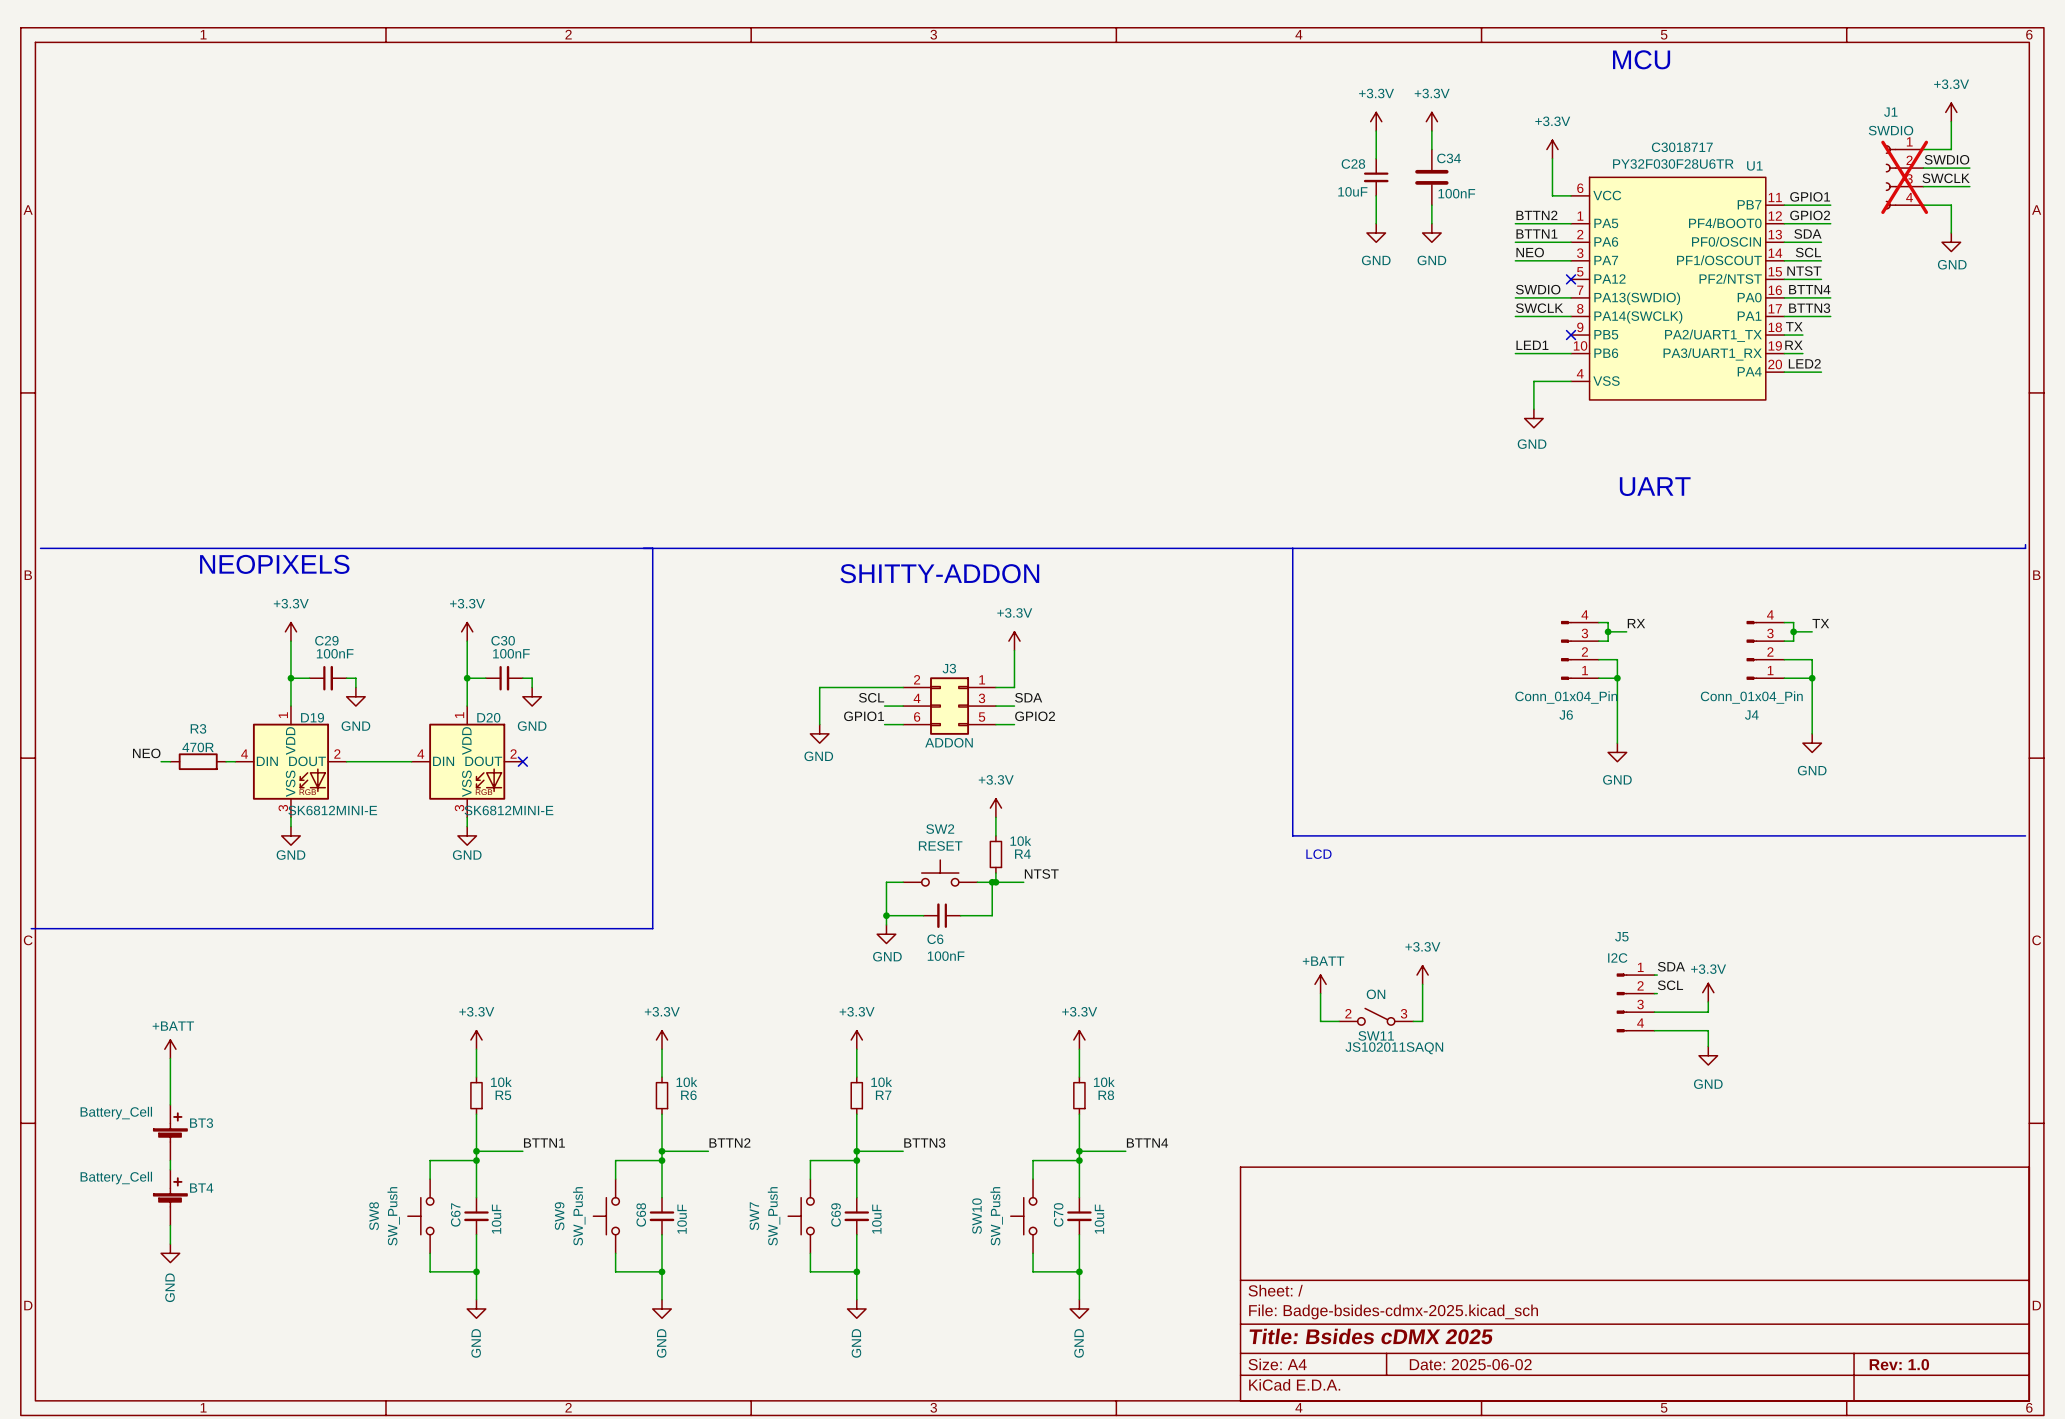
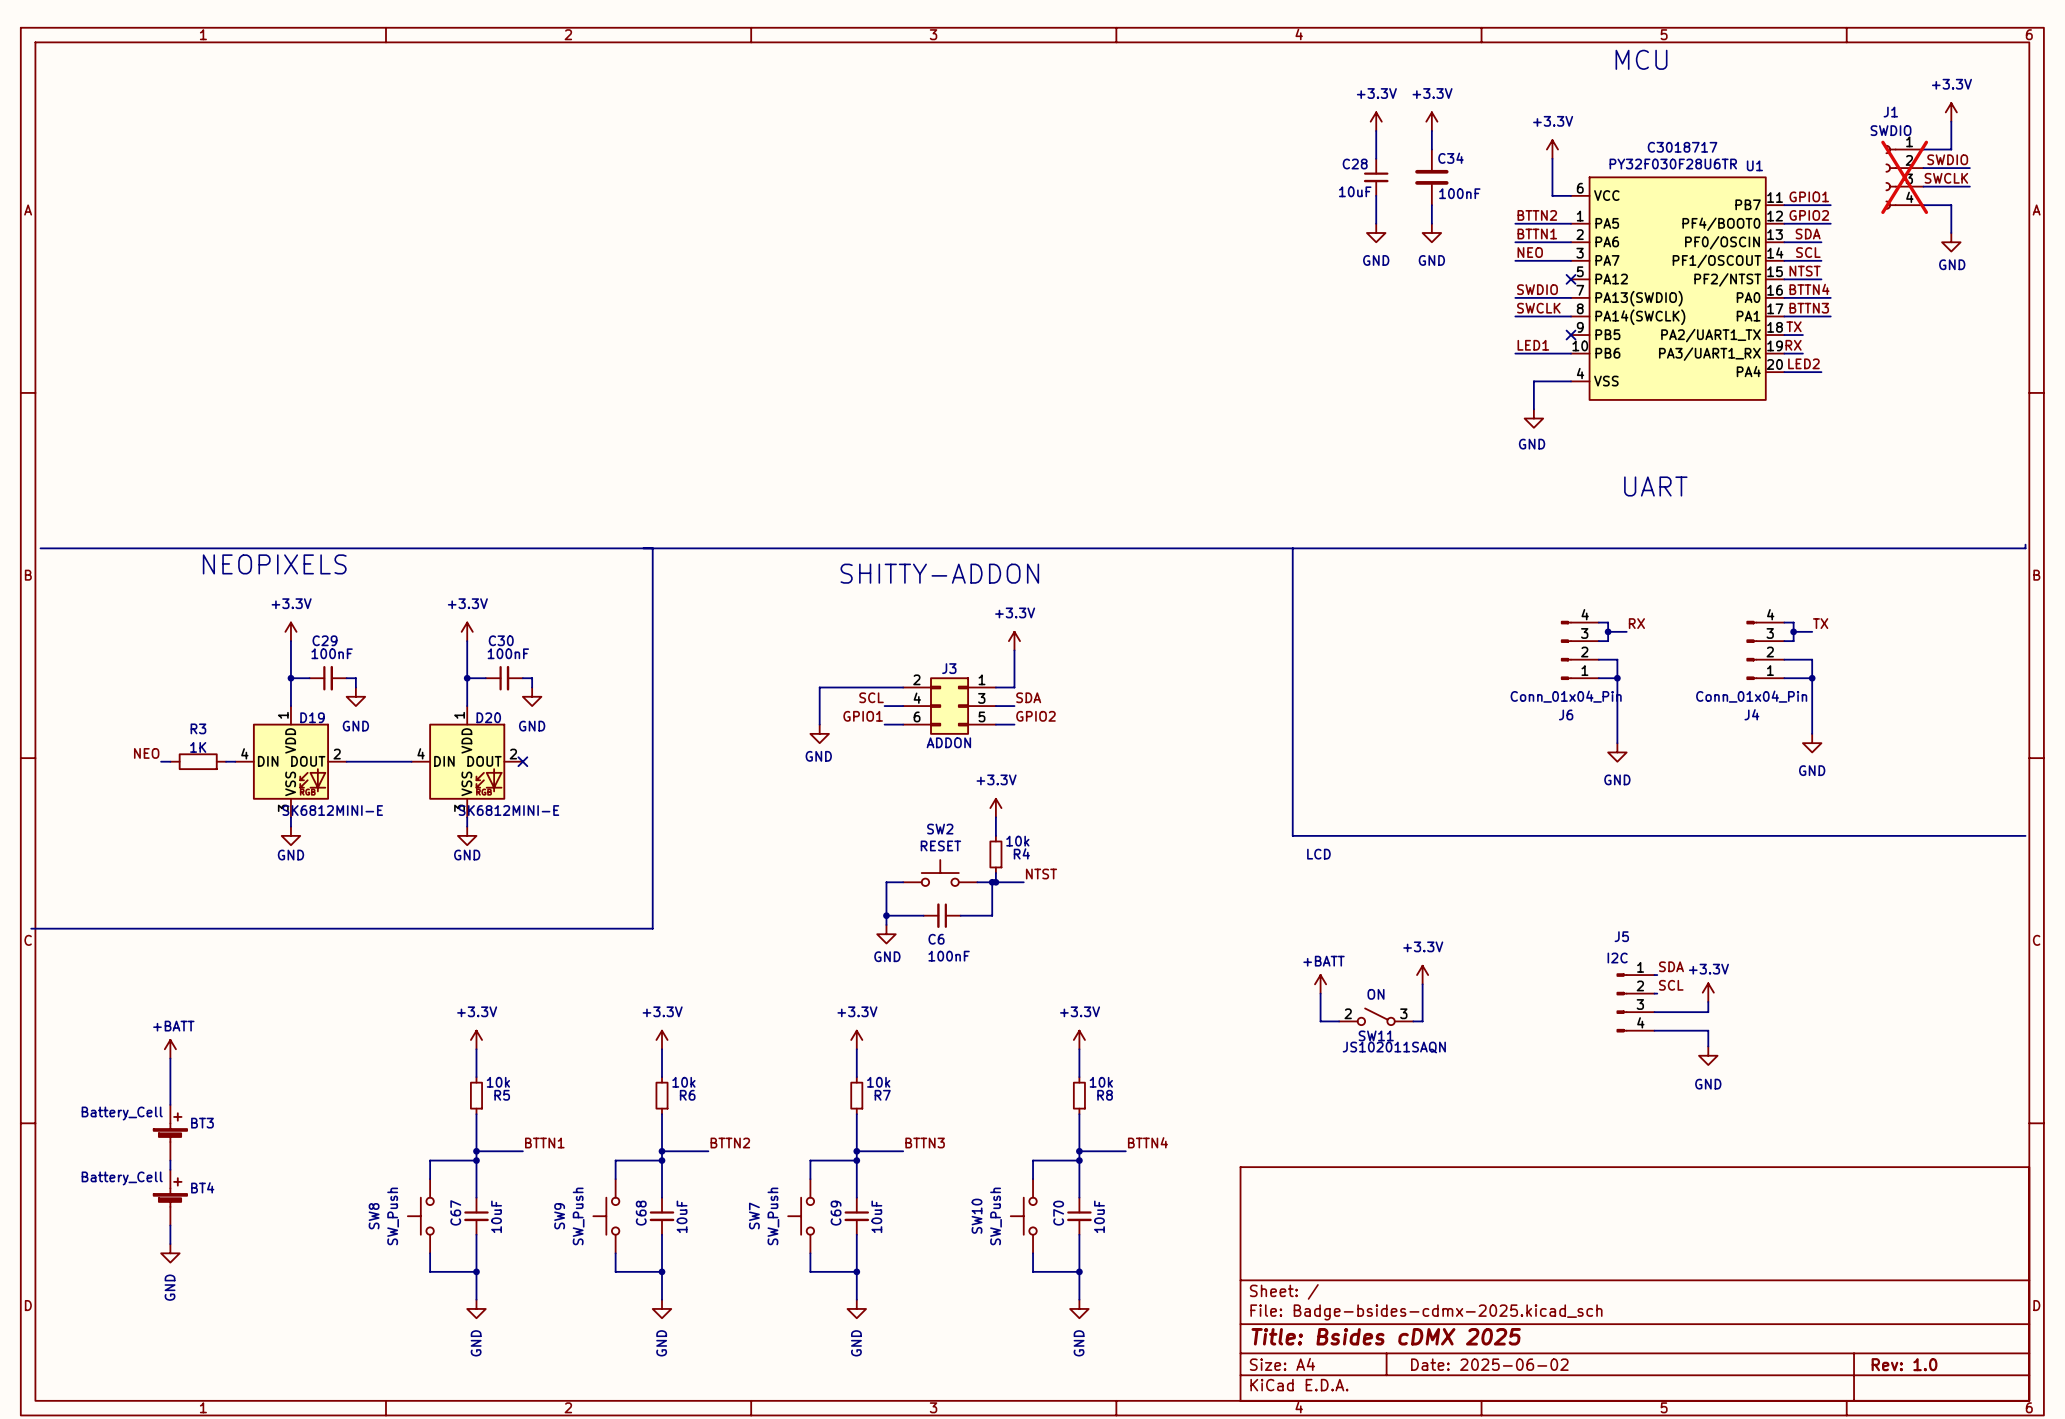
R3 value: 470R (198, 747) -> 1K (198, 747)

